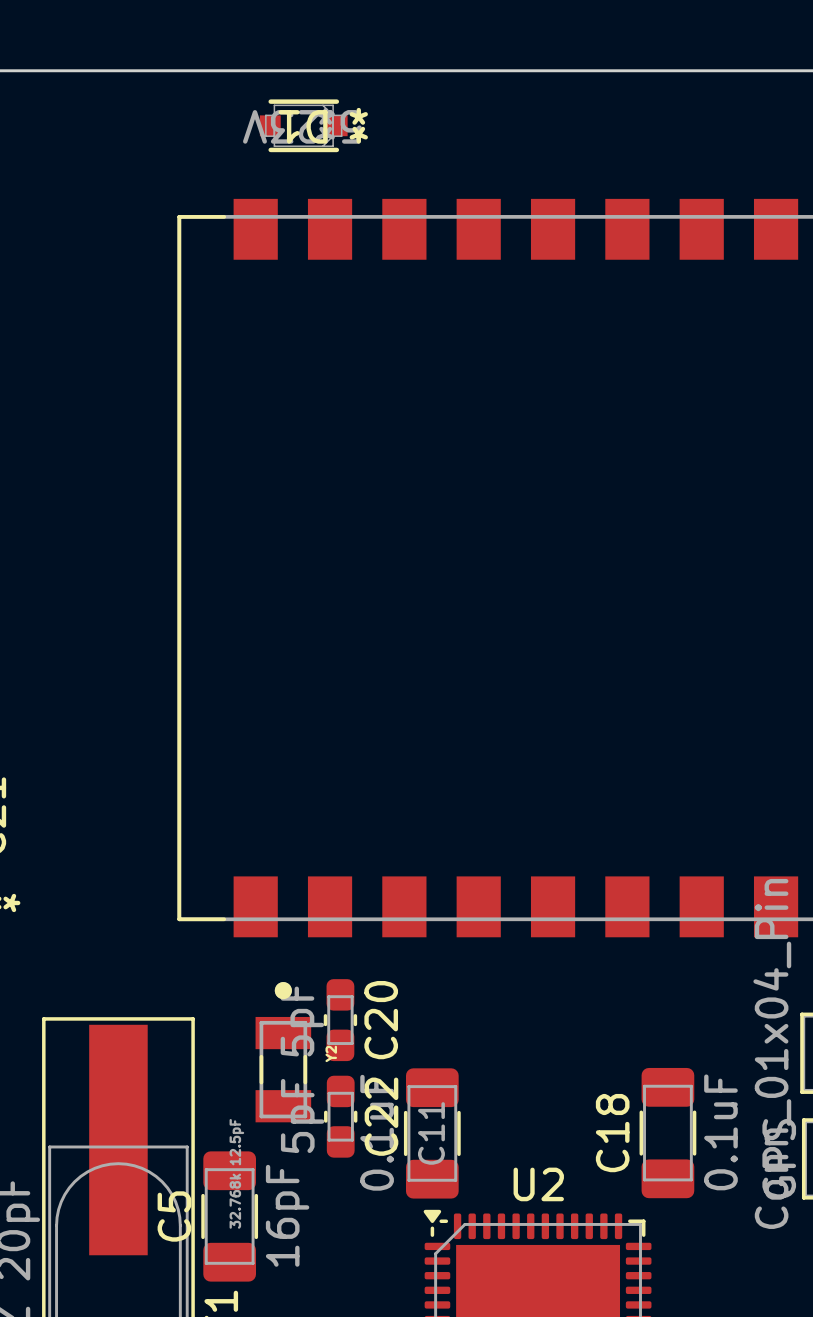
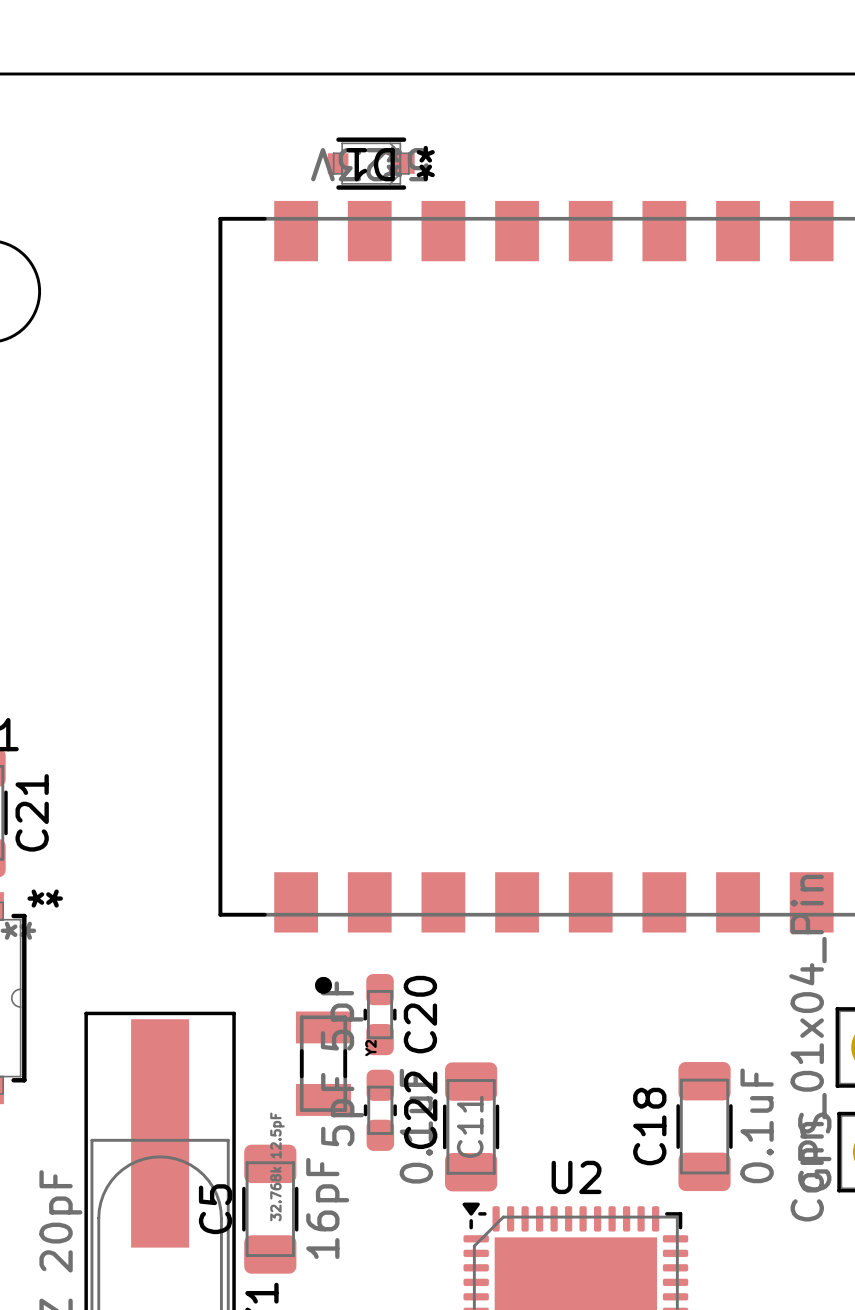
D1 position: (303, 125) -> (371, 163)

